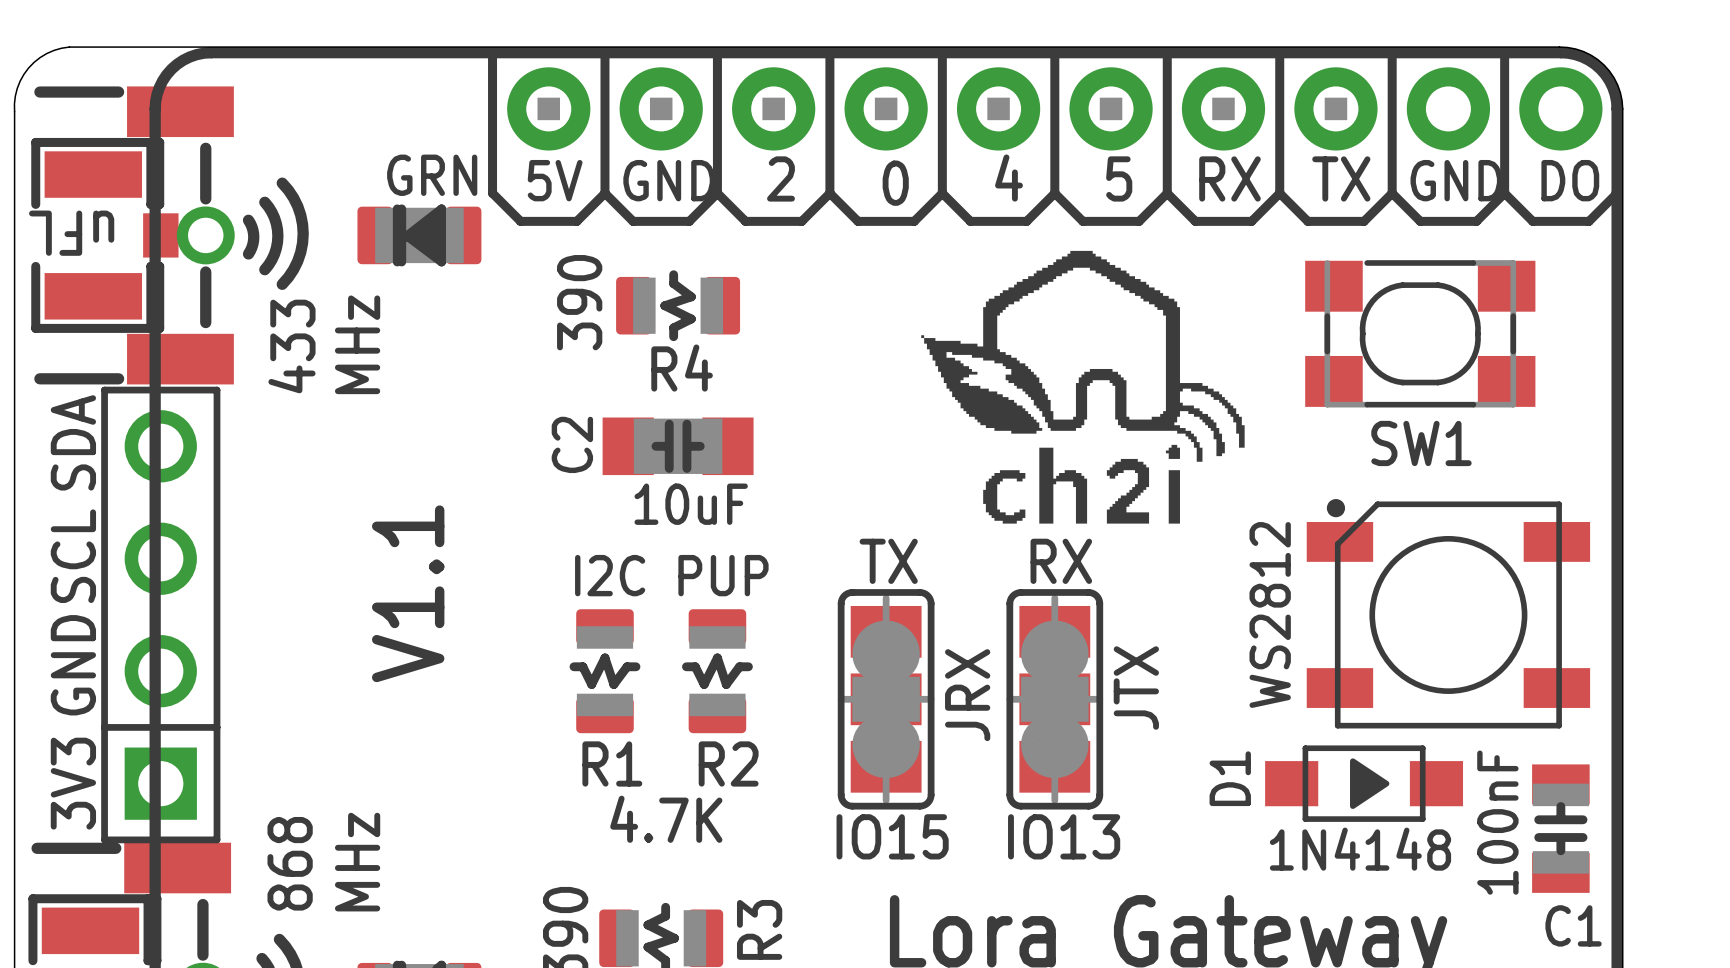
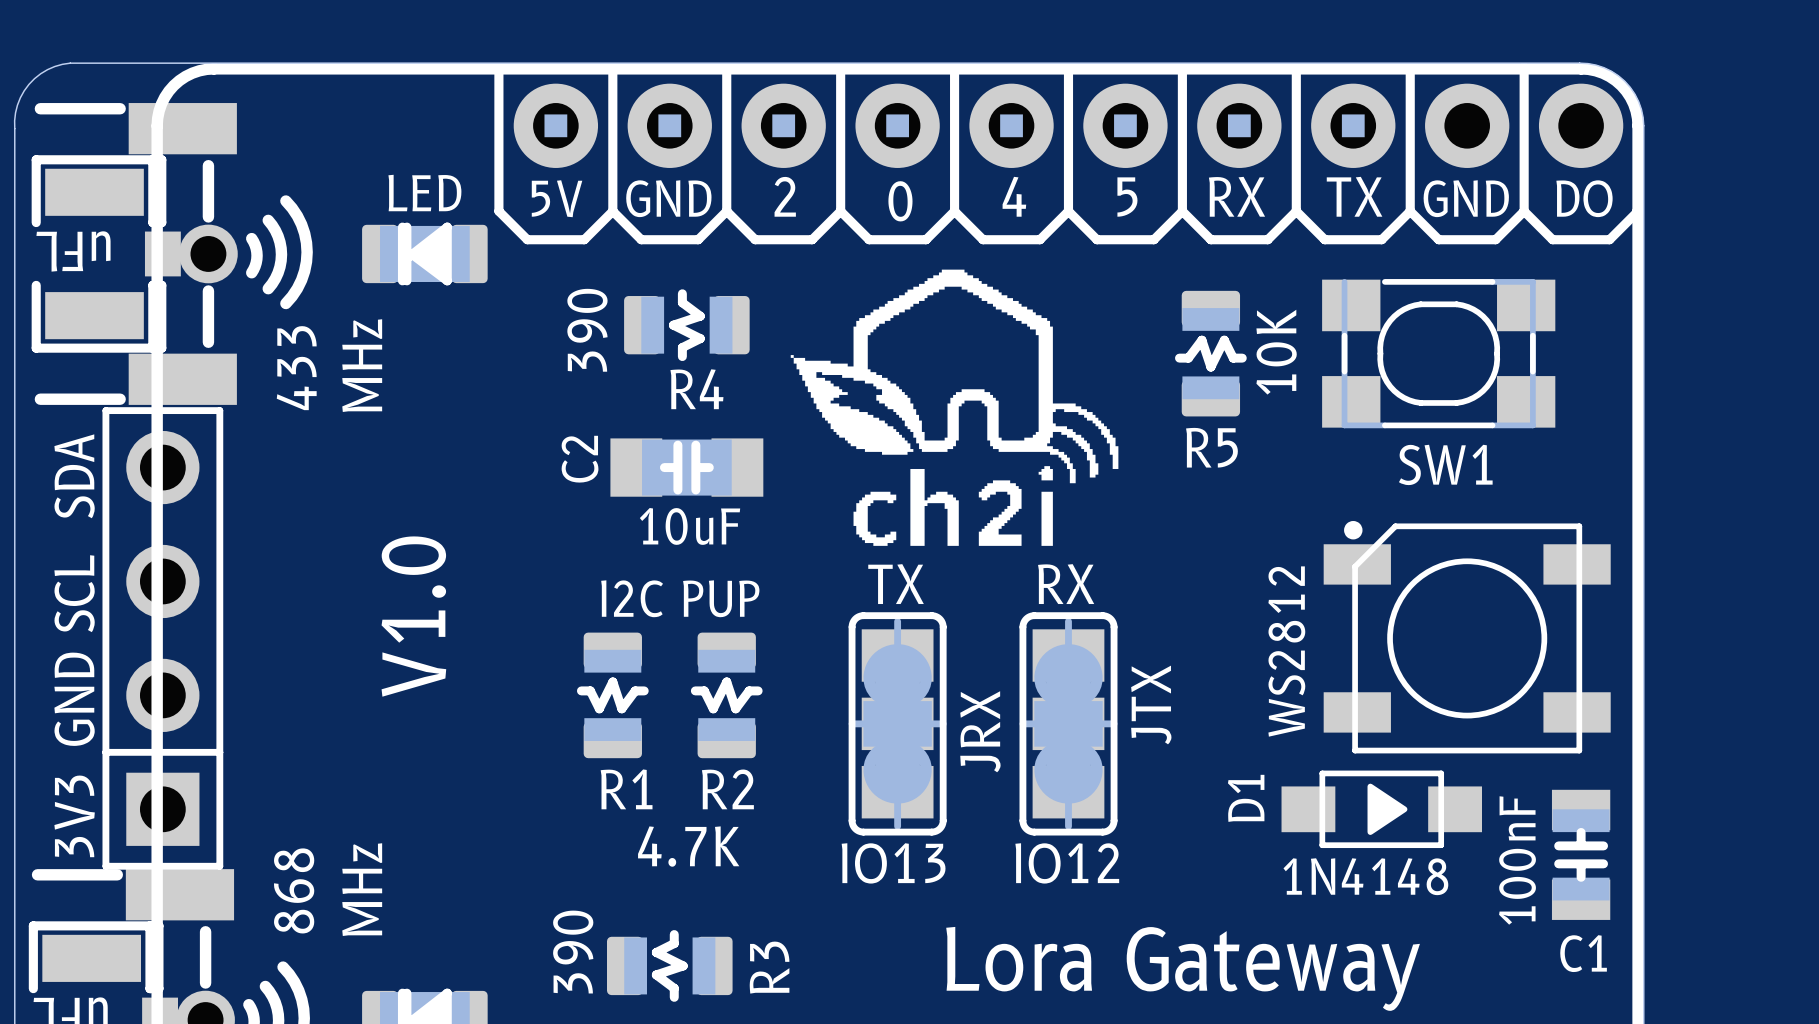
part value: GRN (432, 175) -> LED (424, 193)
R5: none -> 10K (1210, 353)
drawing position: (1082, 387) -> (954, 407)
text: V1.1 (408, 593) -> V1.0 (413, 616)
text: IO15 (892, 836) -> IO13 (893, 863)
text: IO13 (1064, 836) -> IO12 (1067, 863)

